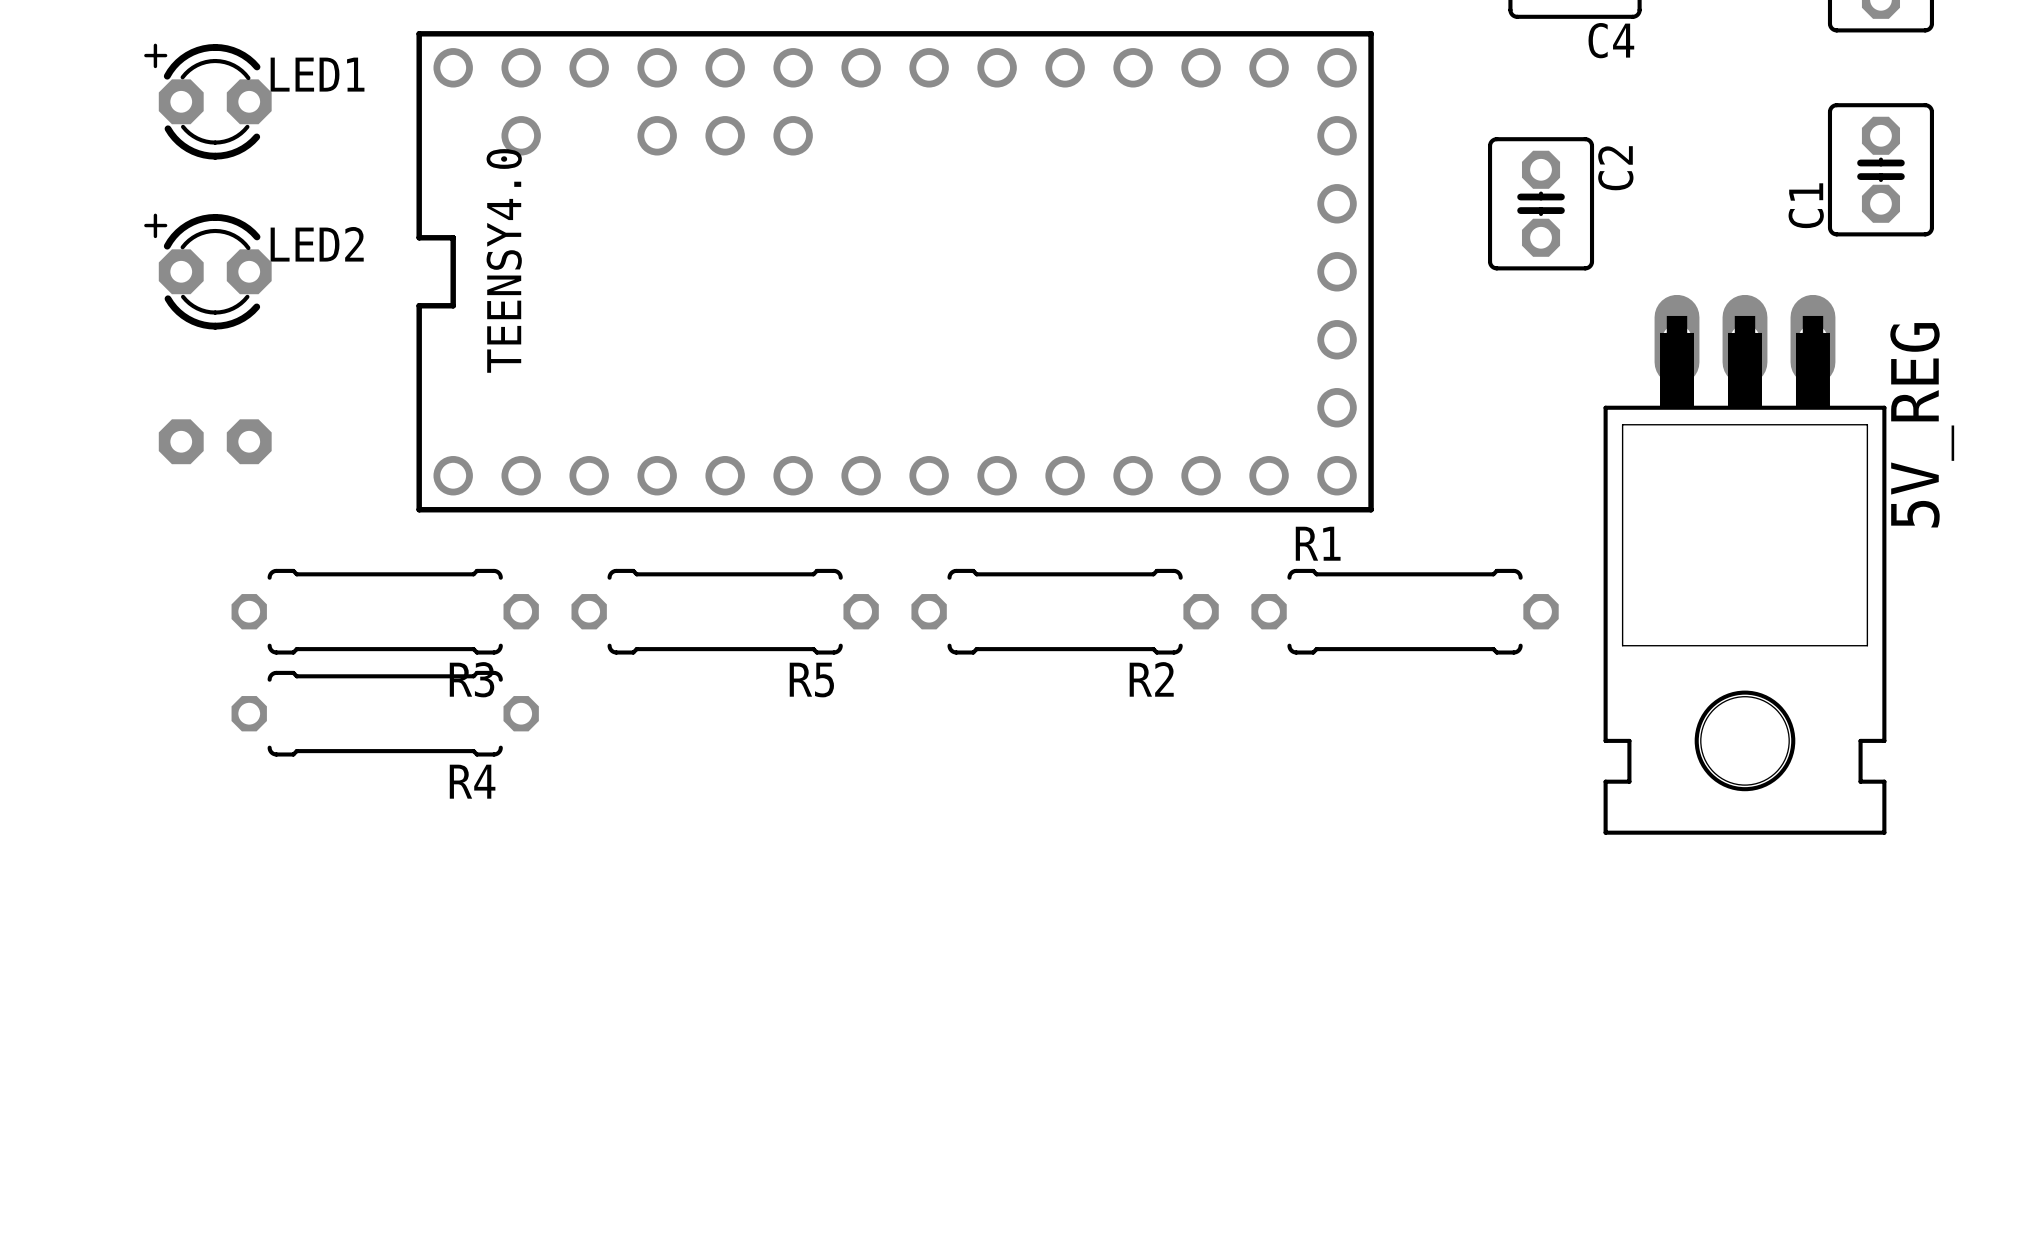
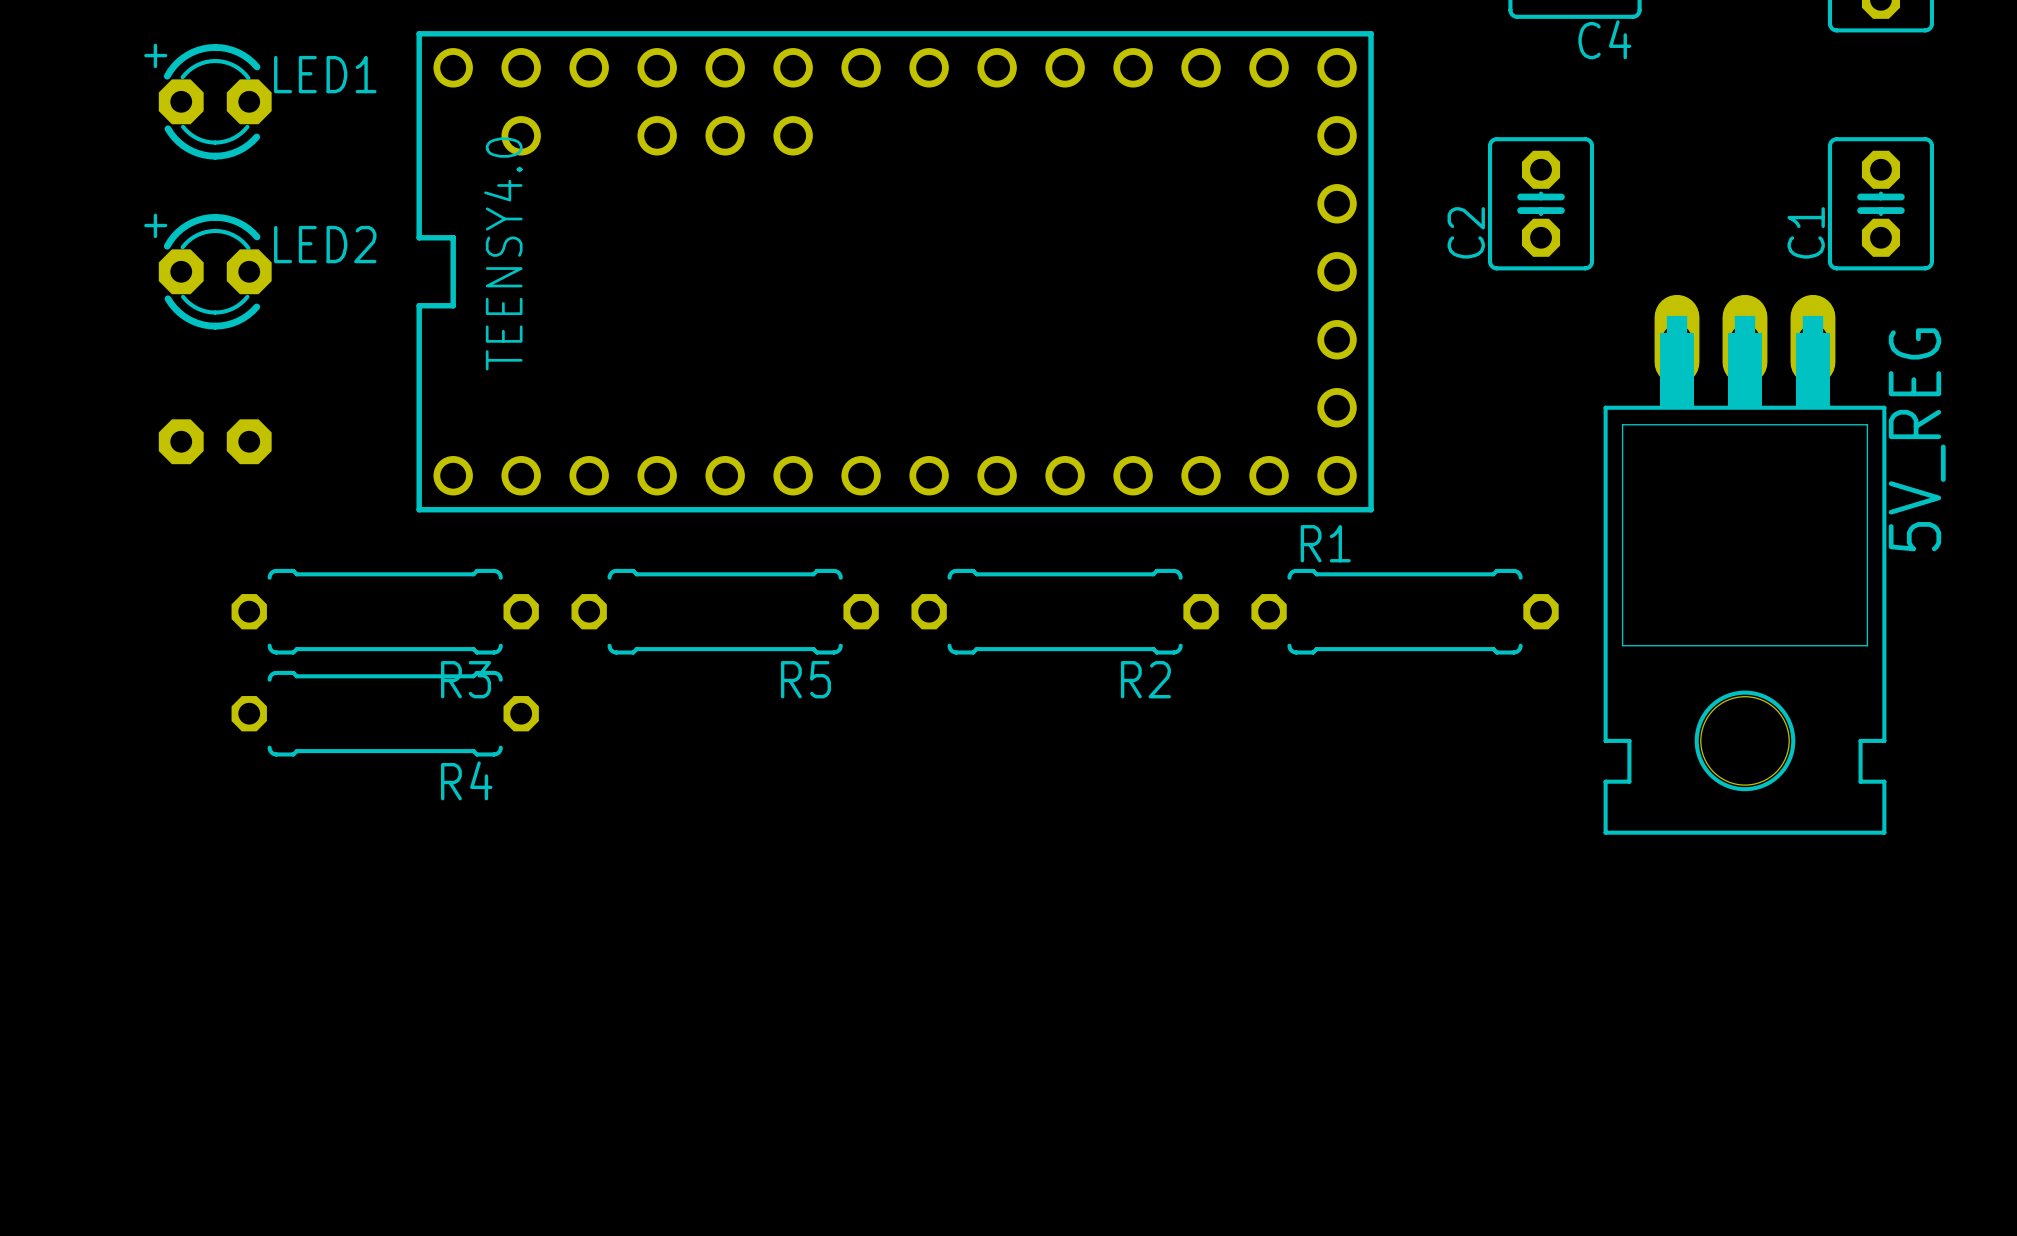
C2 name position: C2 (1615, 168) -> C2 (1466, 232)
C1 position: (1880, 169) -> (1880, 203)

